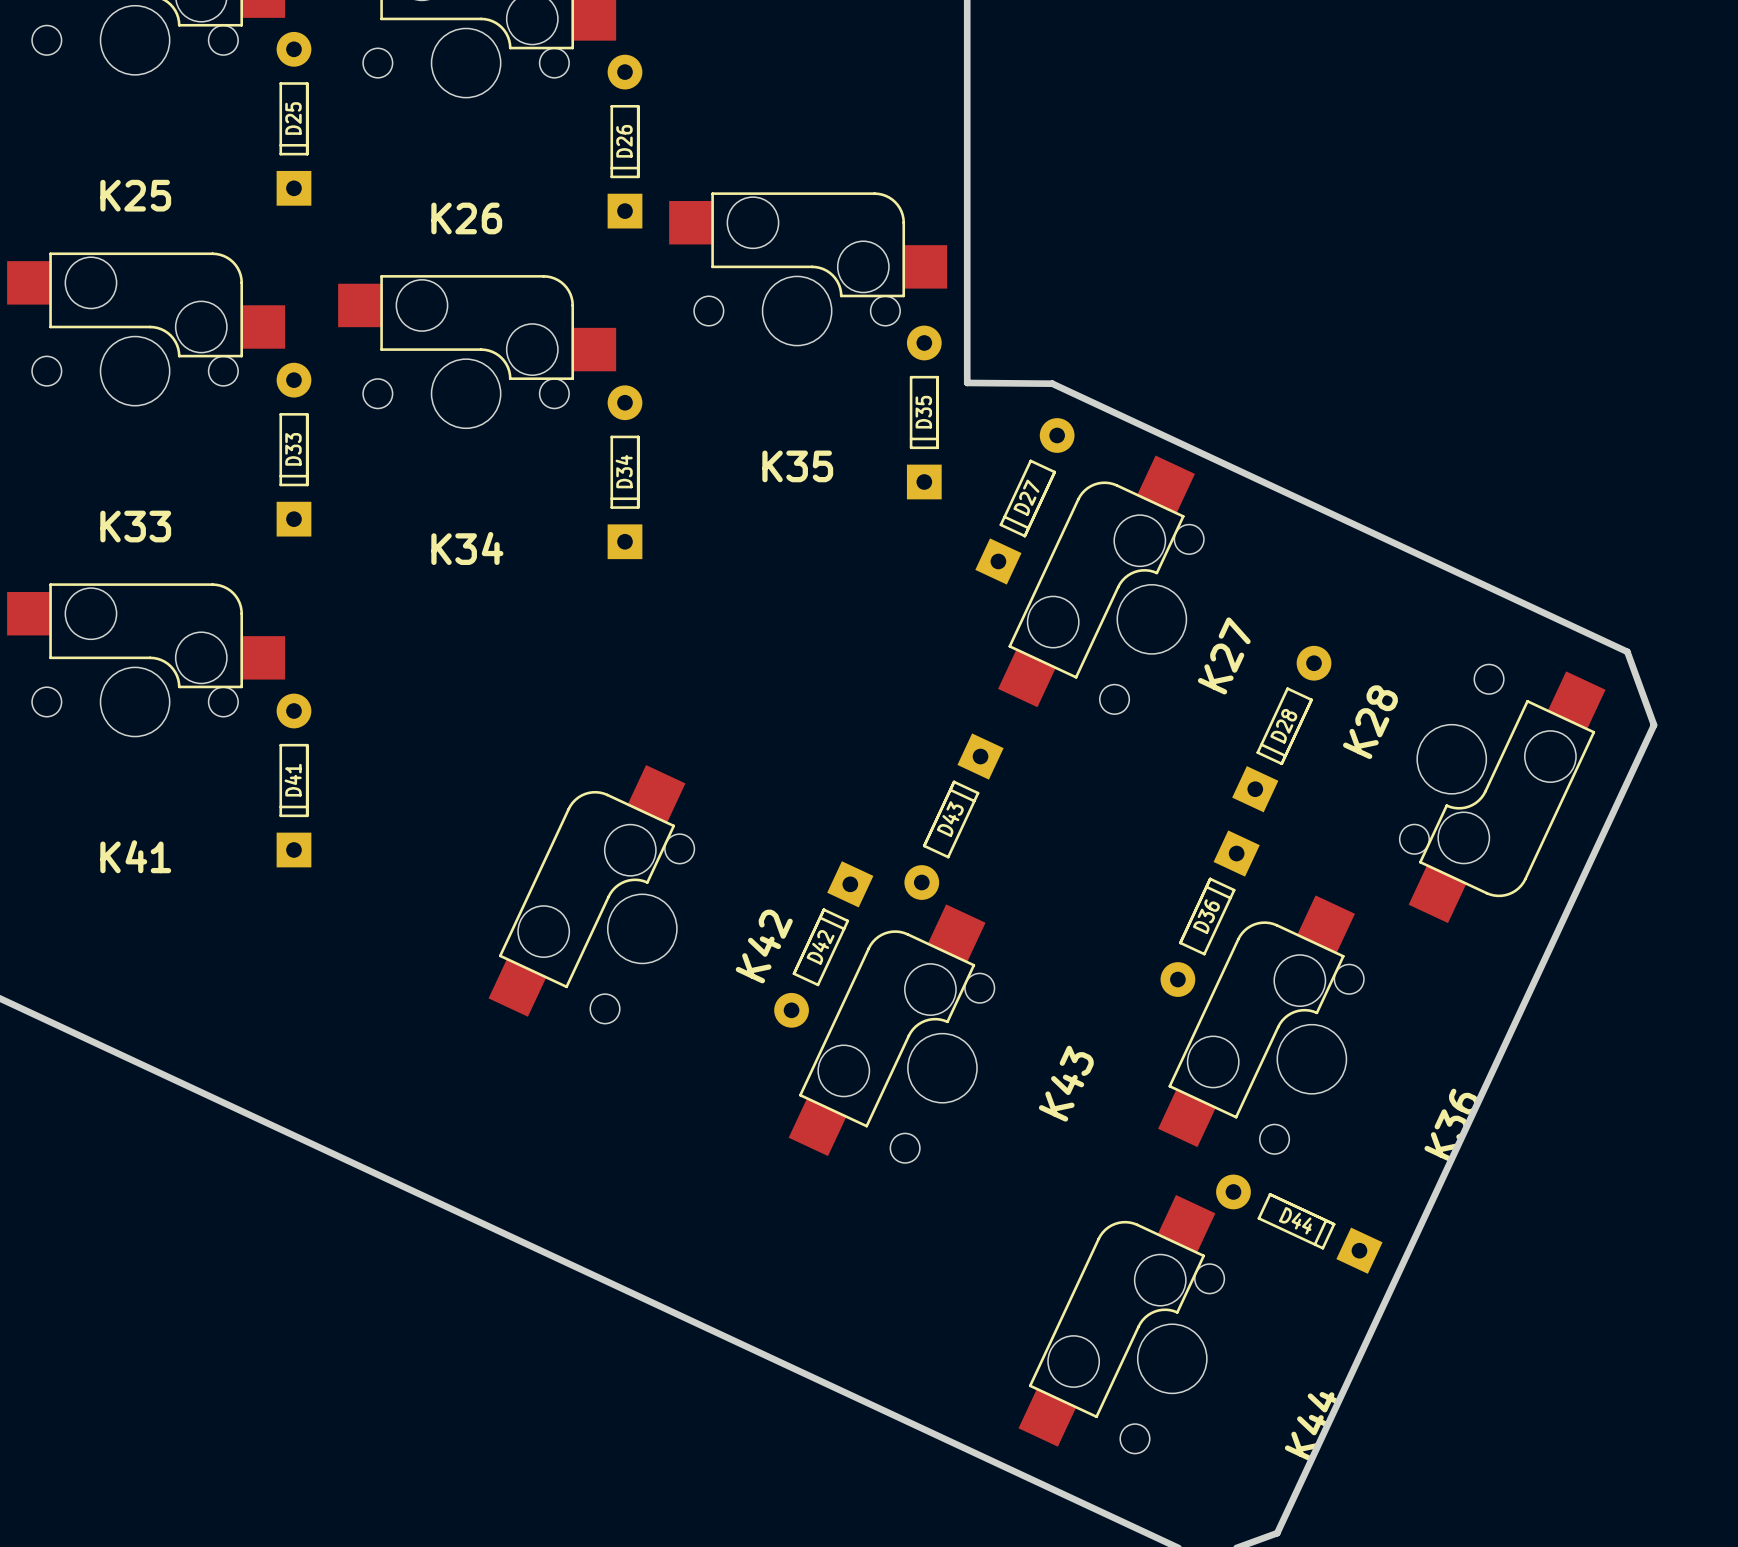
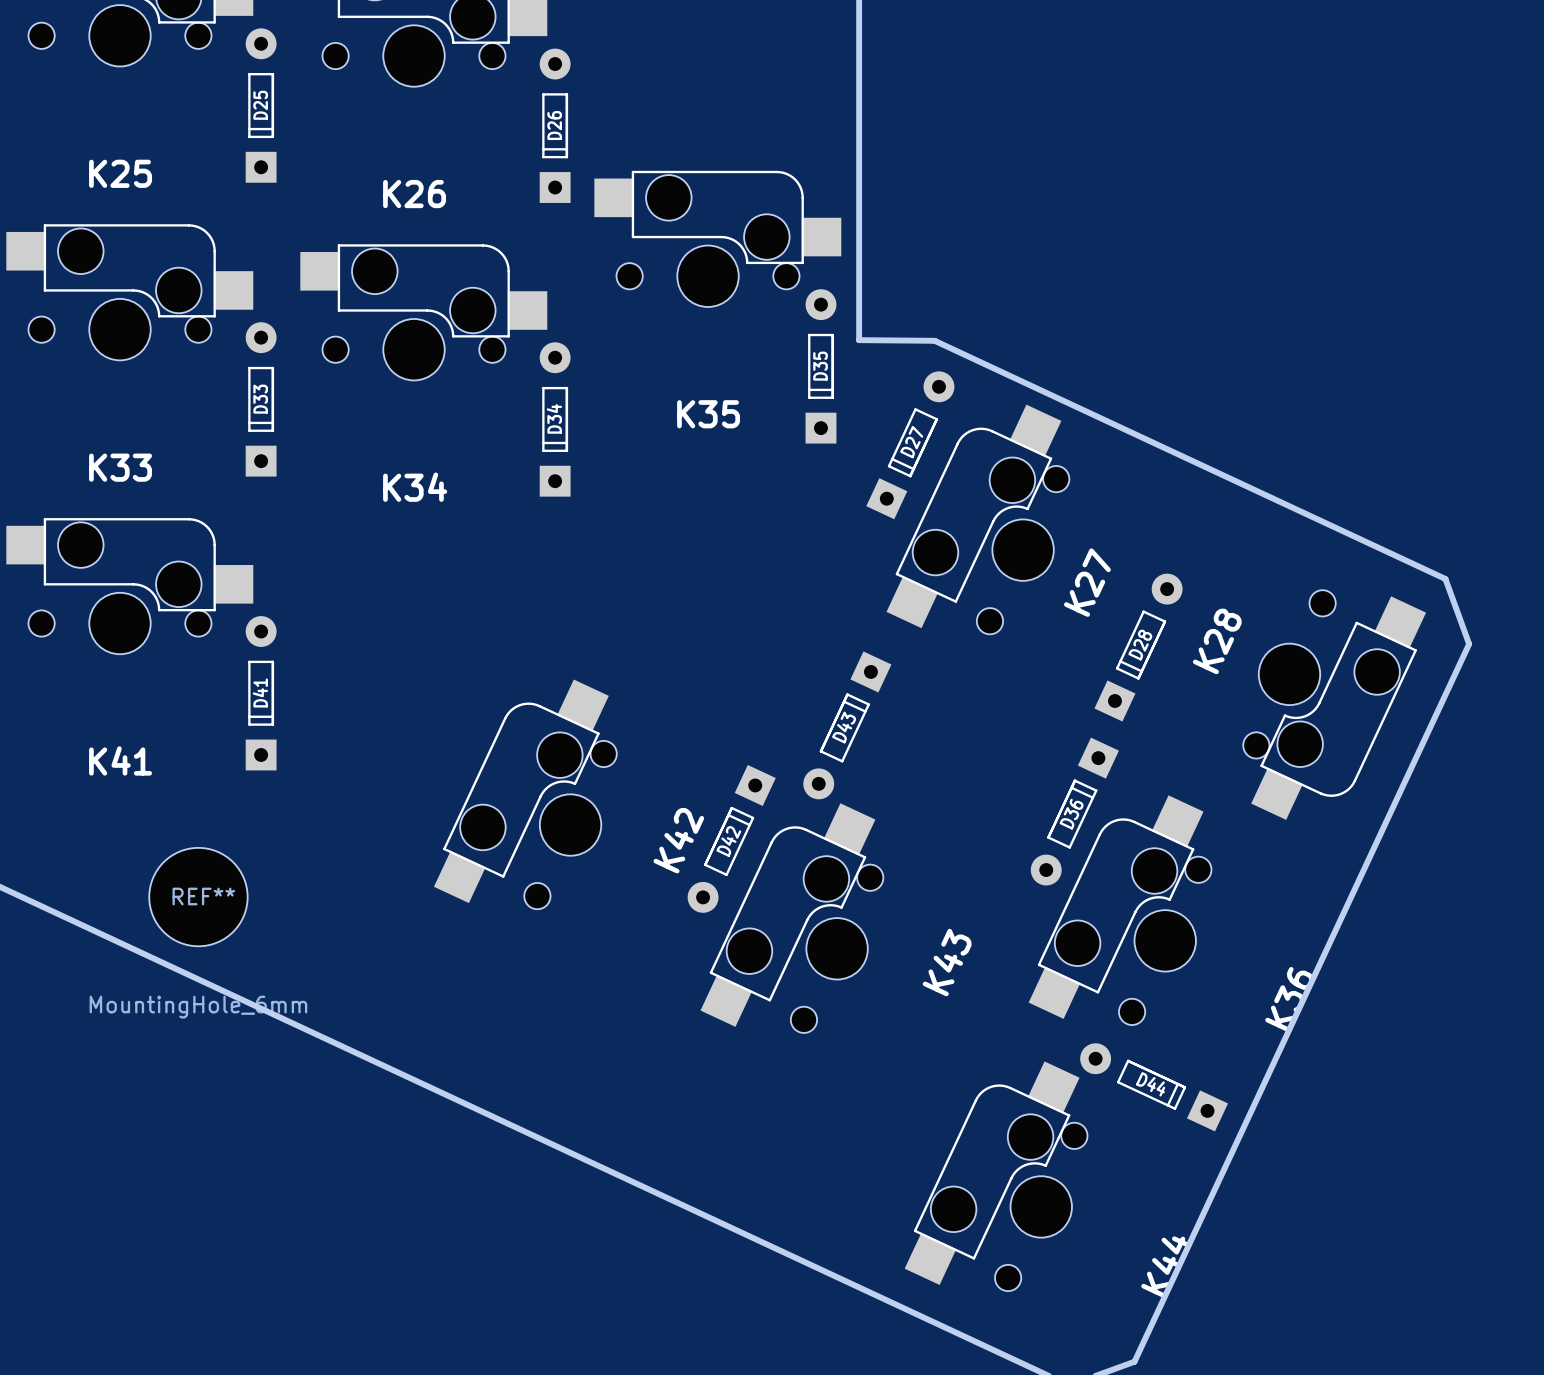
REF**: none -> MountingHole_6mm (198, 897)

